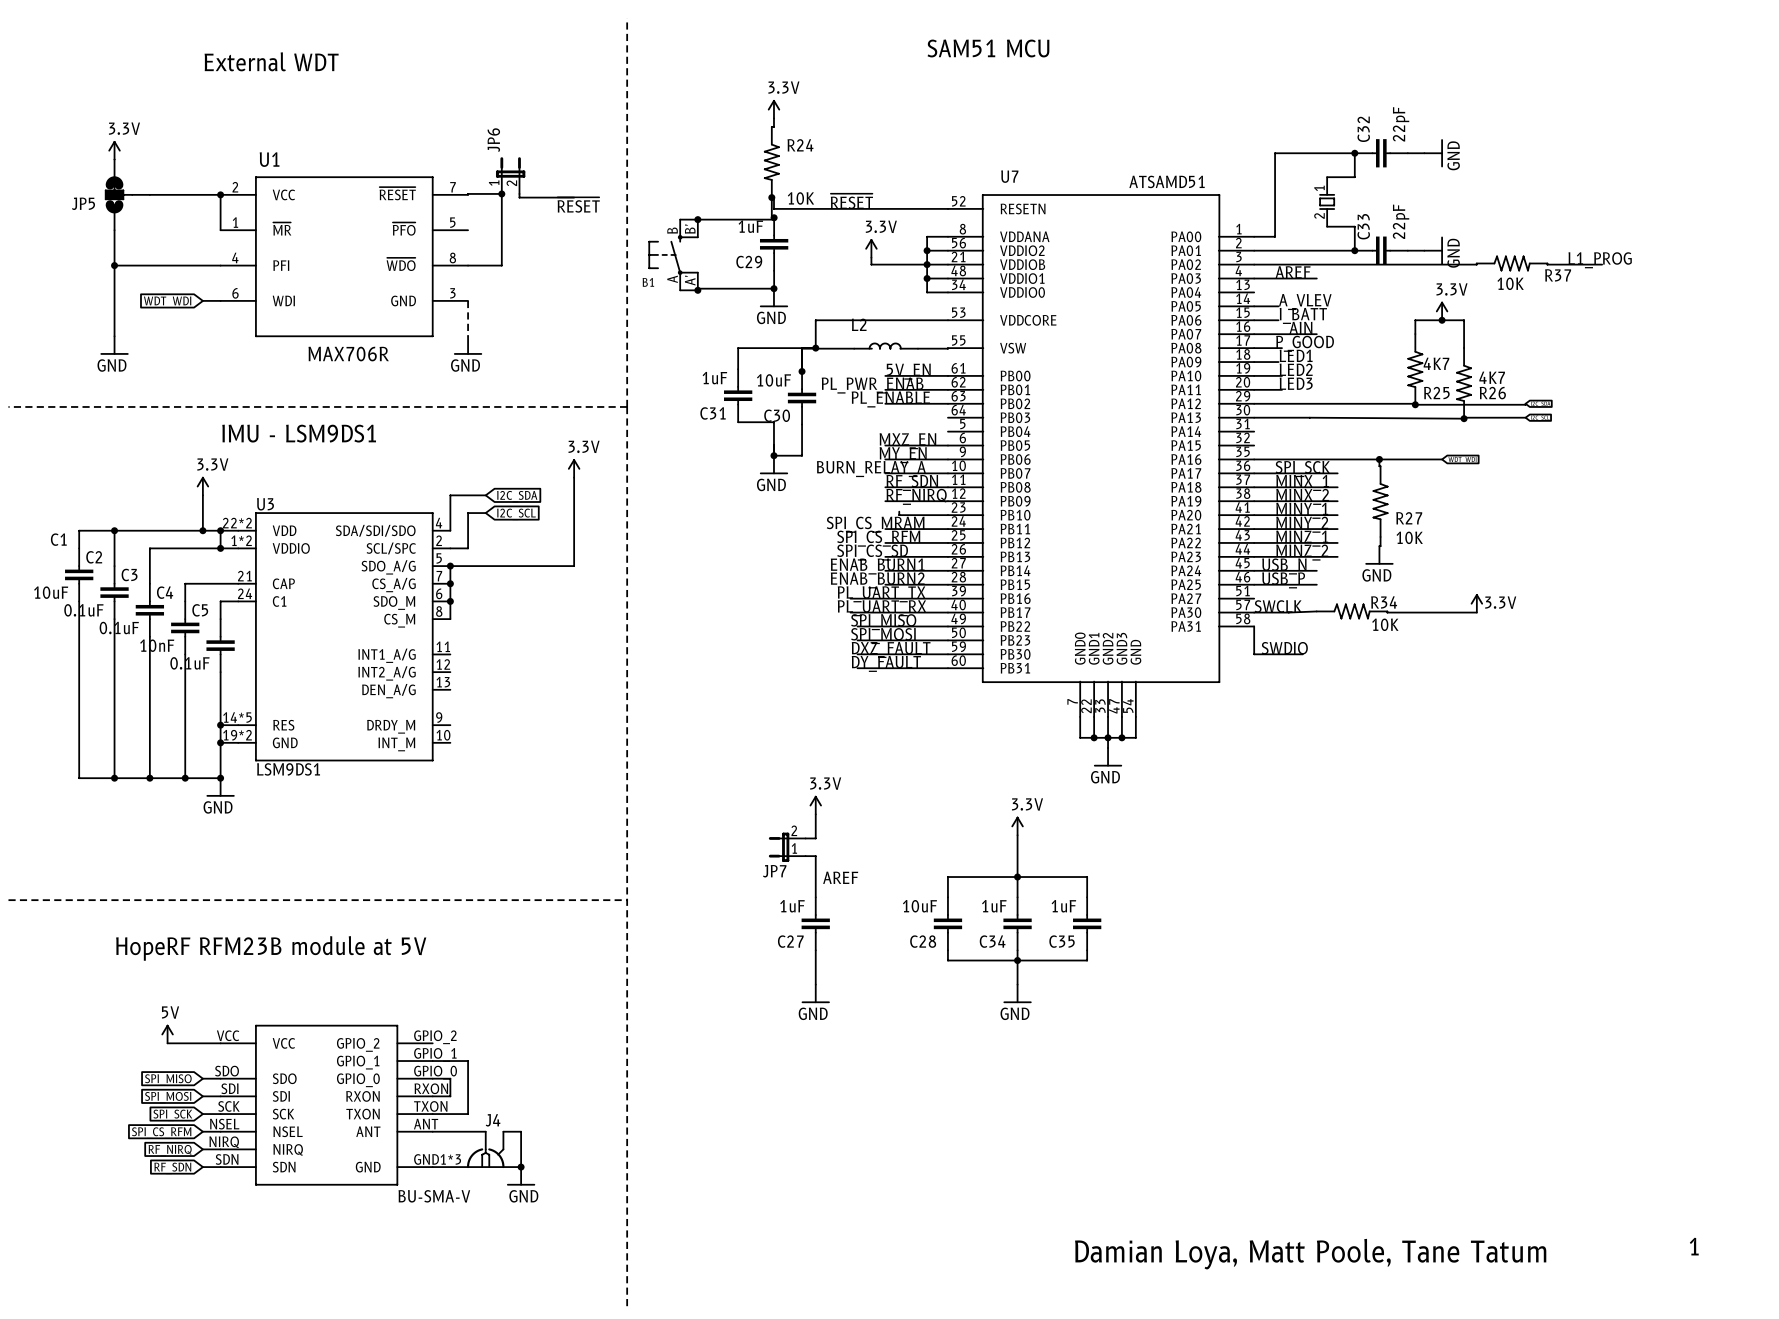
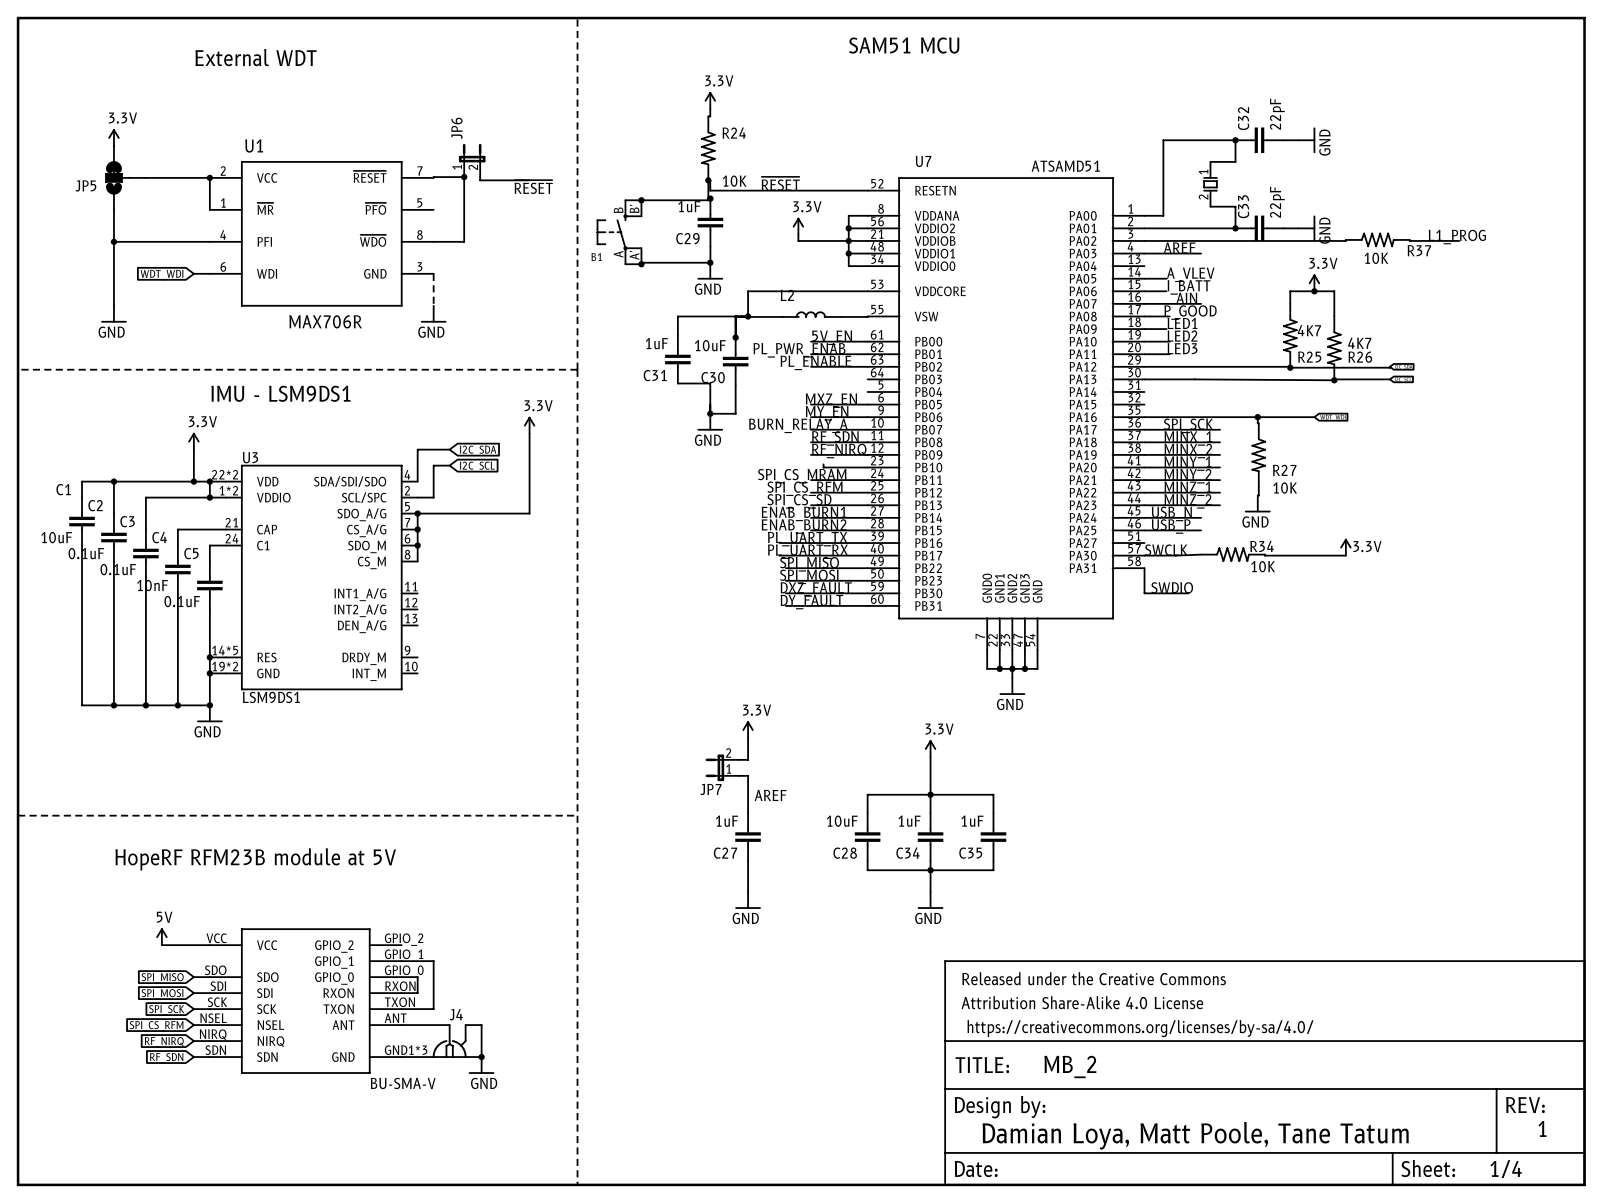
part: none -> (801, 601)
part: none -> (1264, 1073)

